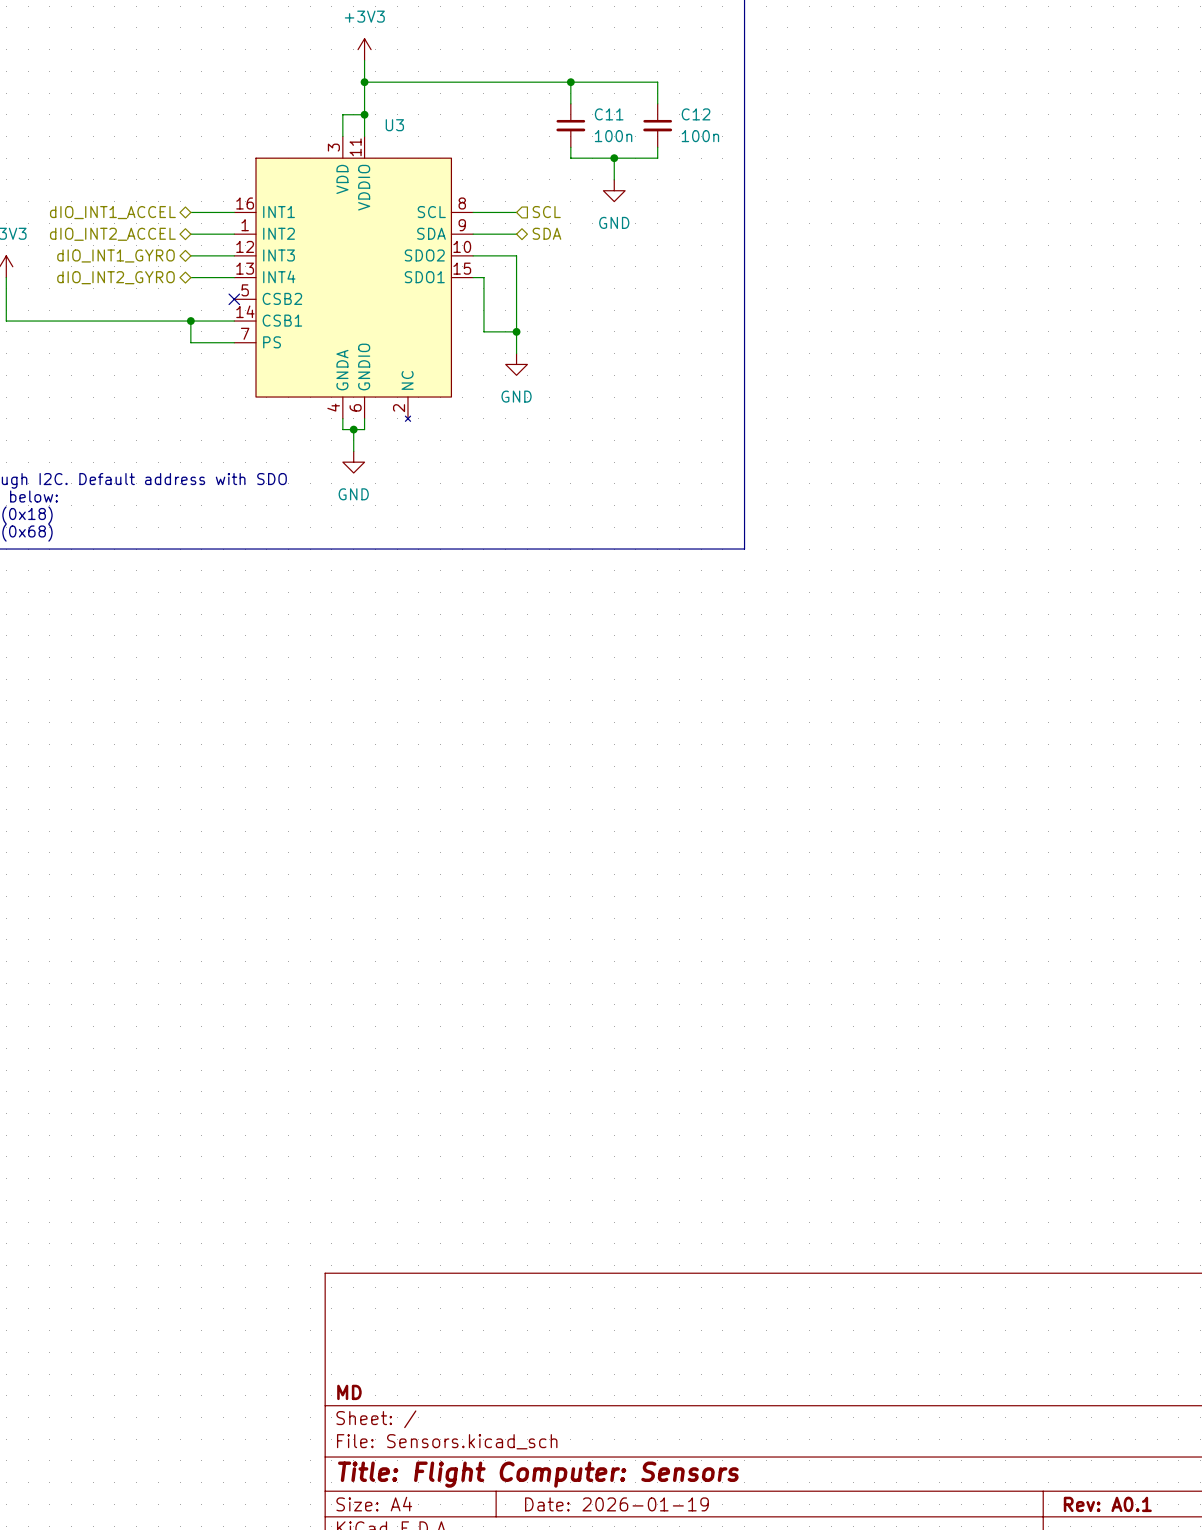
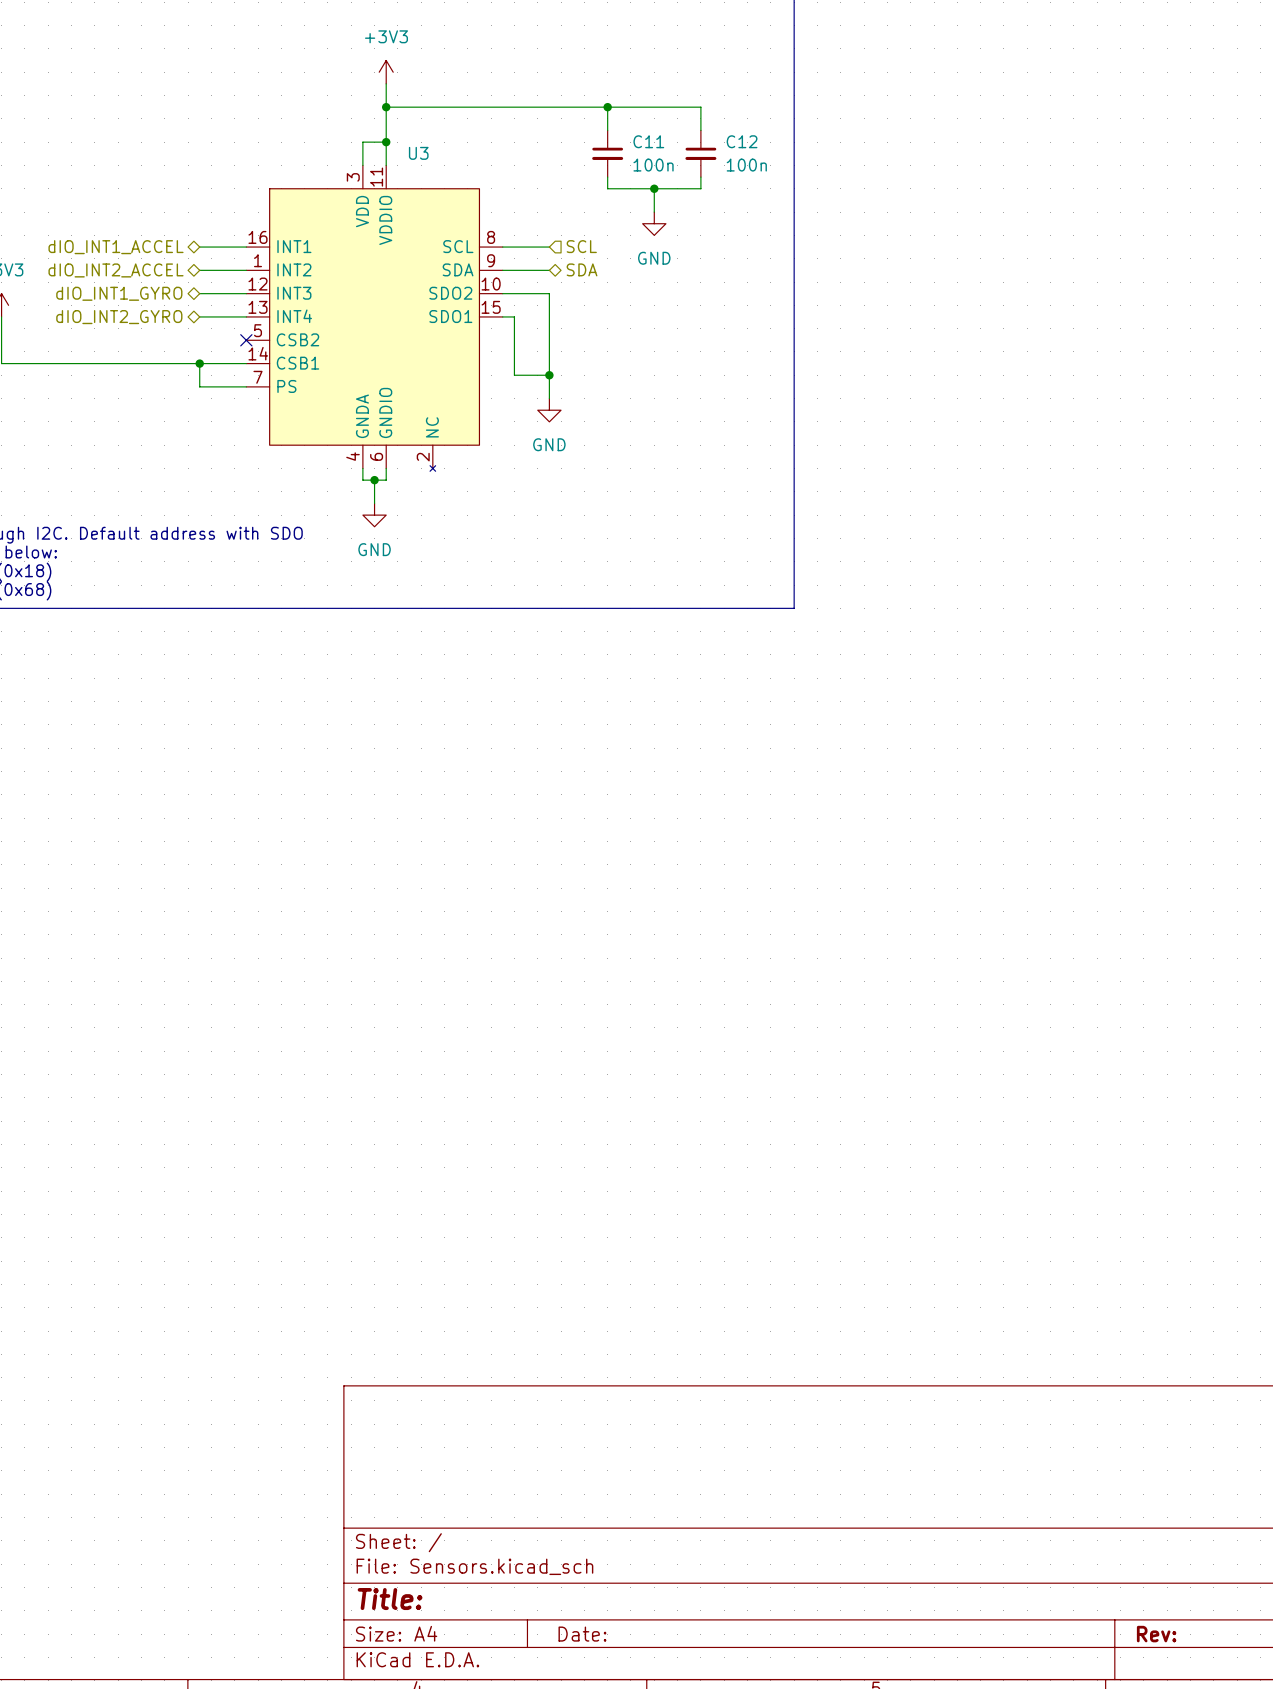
title block: MD (349, 1392) -> none
title block: Title: Flight Computer: Sensors (538, 1474) -> Title: (390, 1599)
title block: Date: 2026-01-19 (616, 1504) -> Date: (582, 1634)
title block: Rev: A0.1 (1107, 1504) -> Rev: (1156, 1634)

